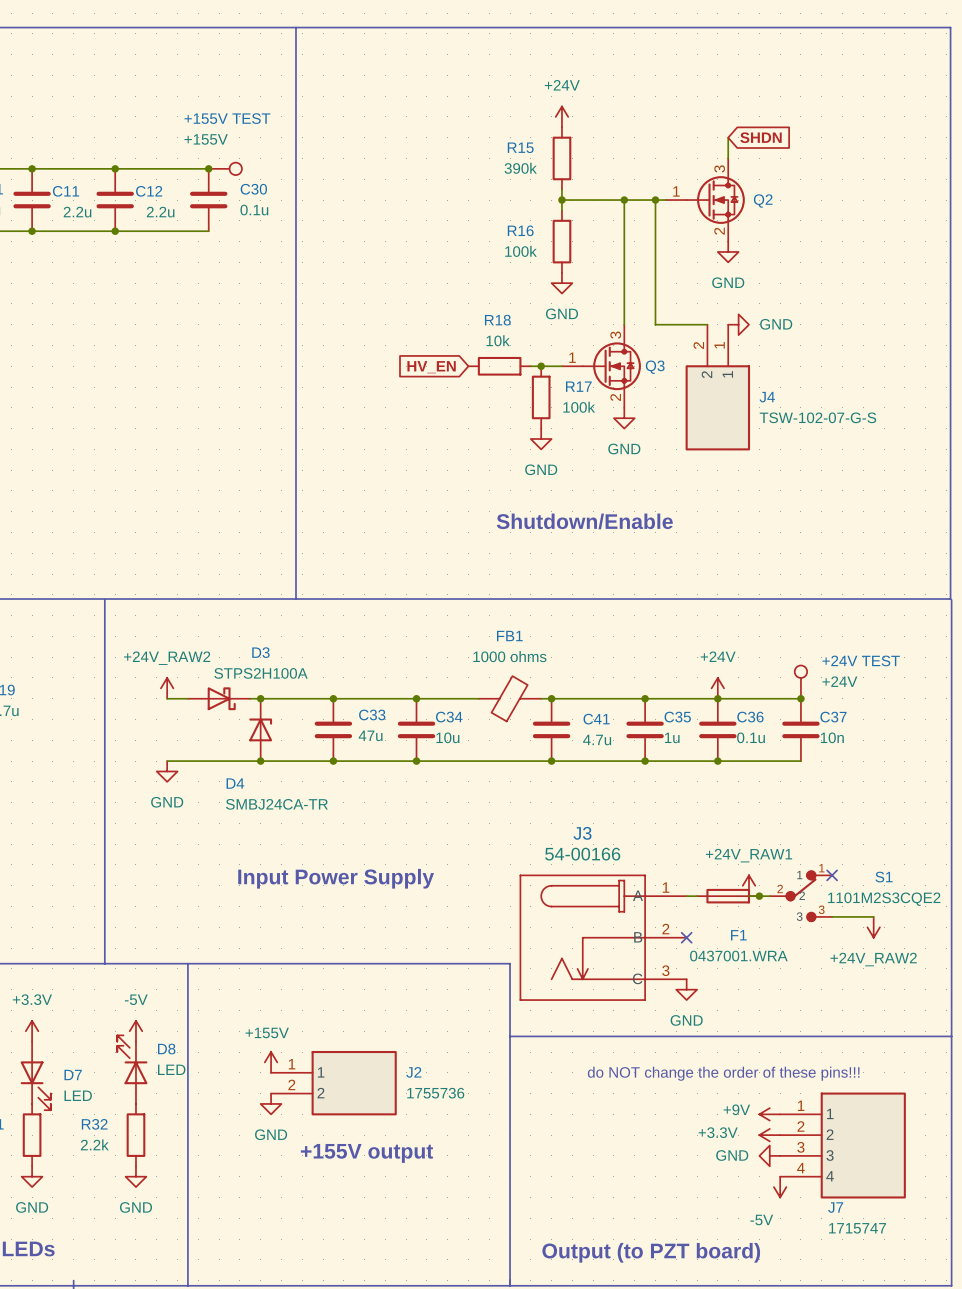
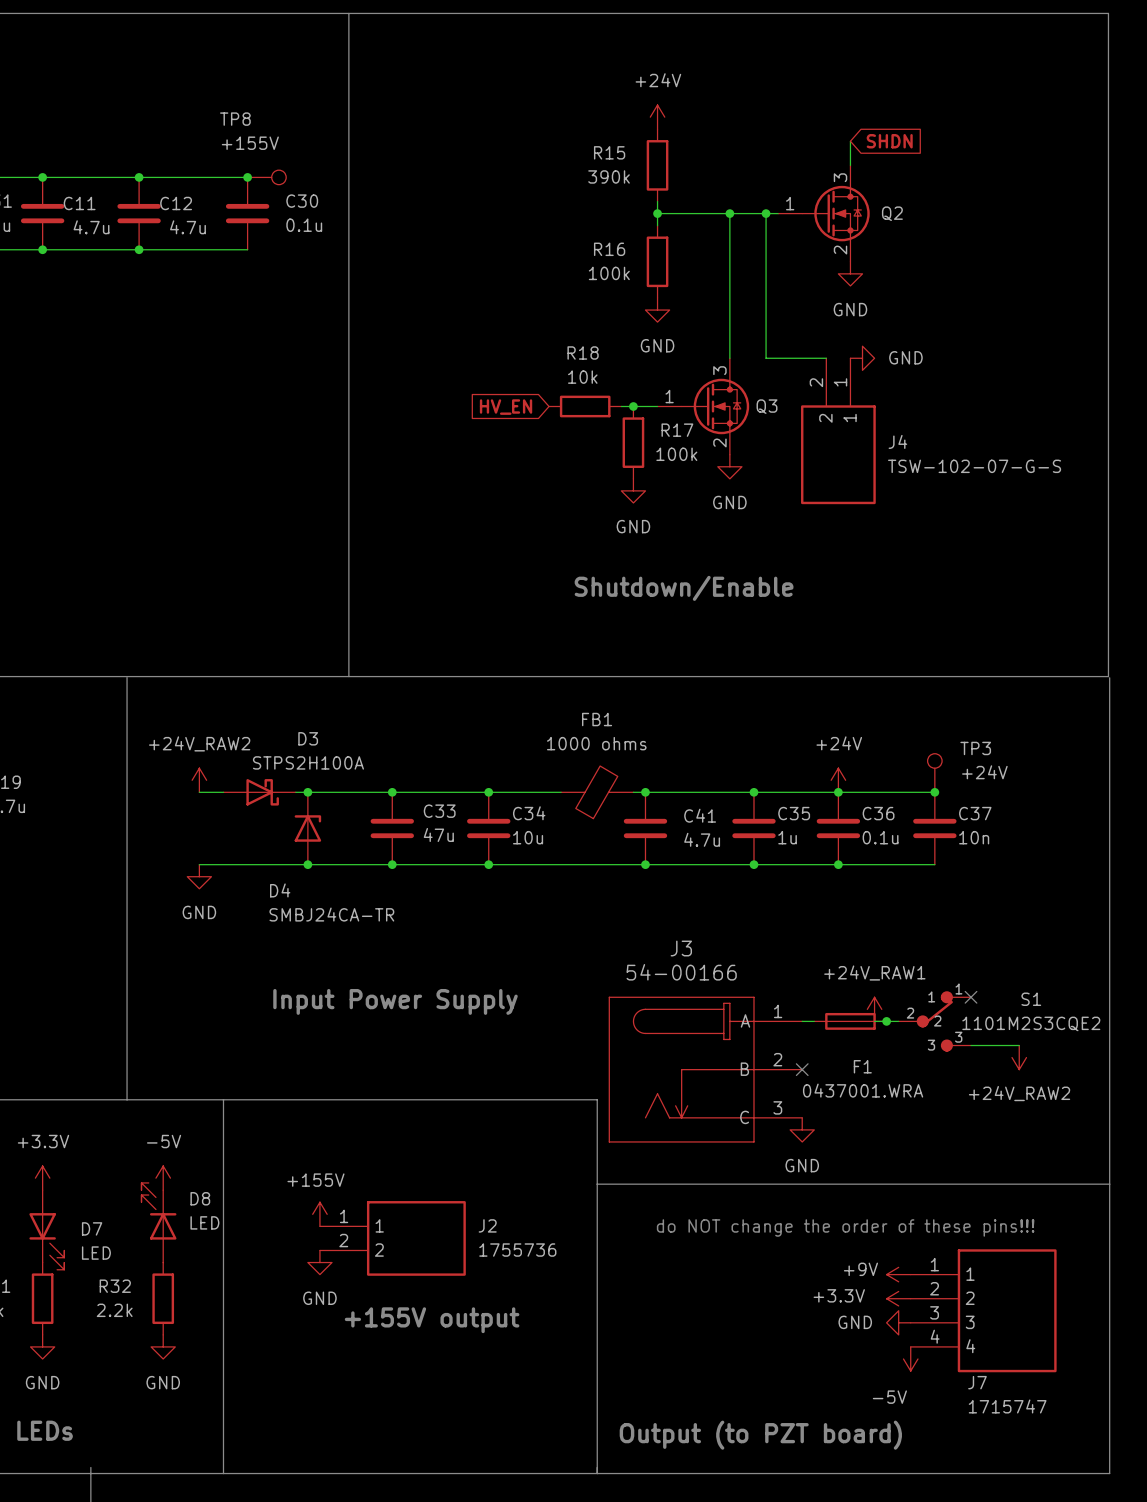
+155V TEST name: +155V TEST (227, 118) -> TP8 (235, 119)
C11 value: 2.2u (77, 212) -> 4.7u (91, 227)
C12 value: 2.2u (160, 212) -> 4.7u (187, 227)
+24V TEST name: +24V TEST (861, 660) -> TP3 (975, 748)

